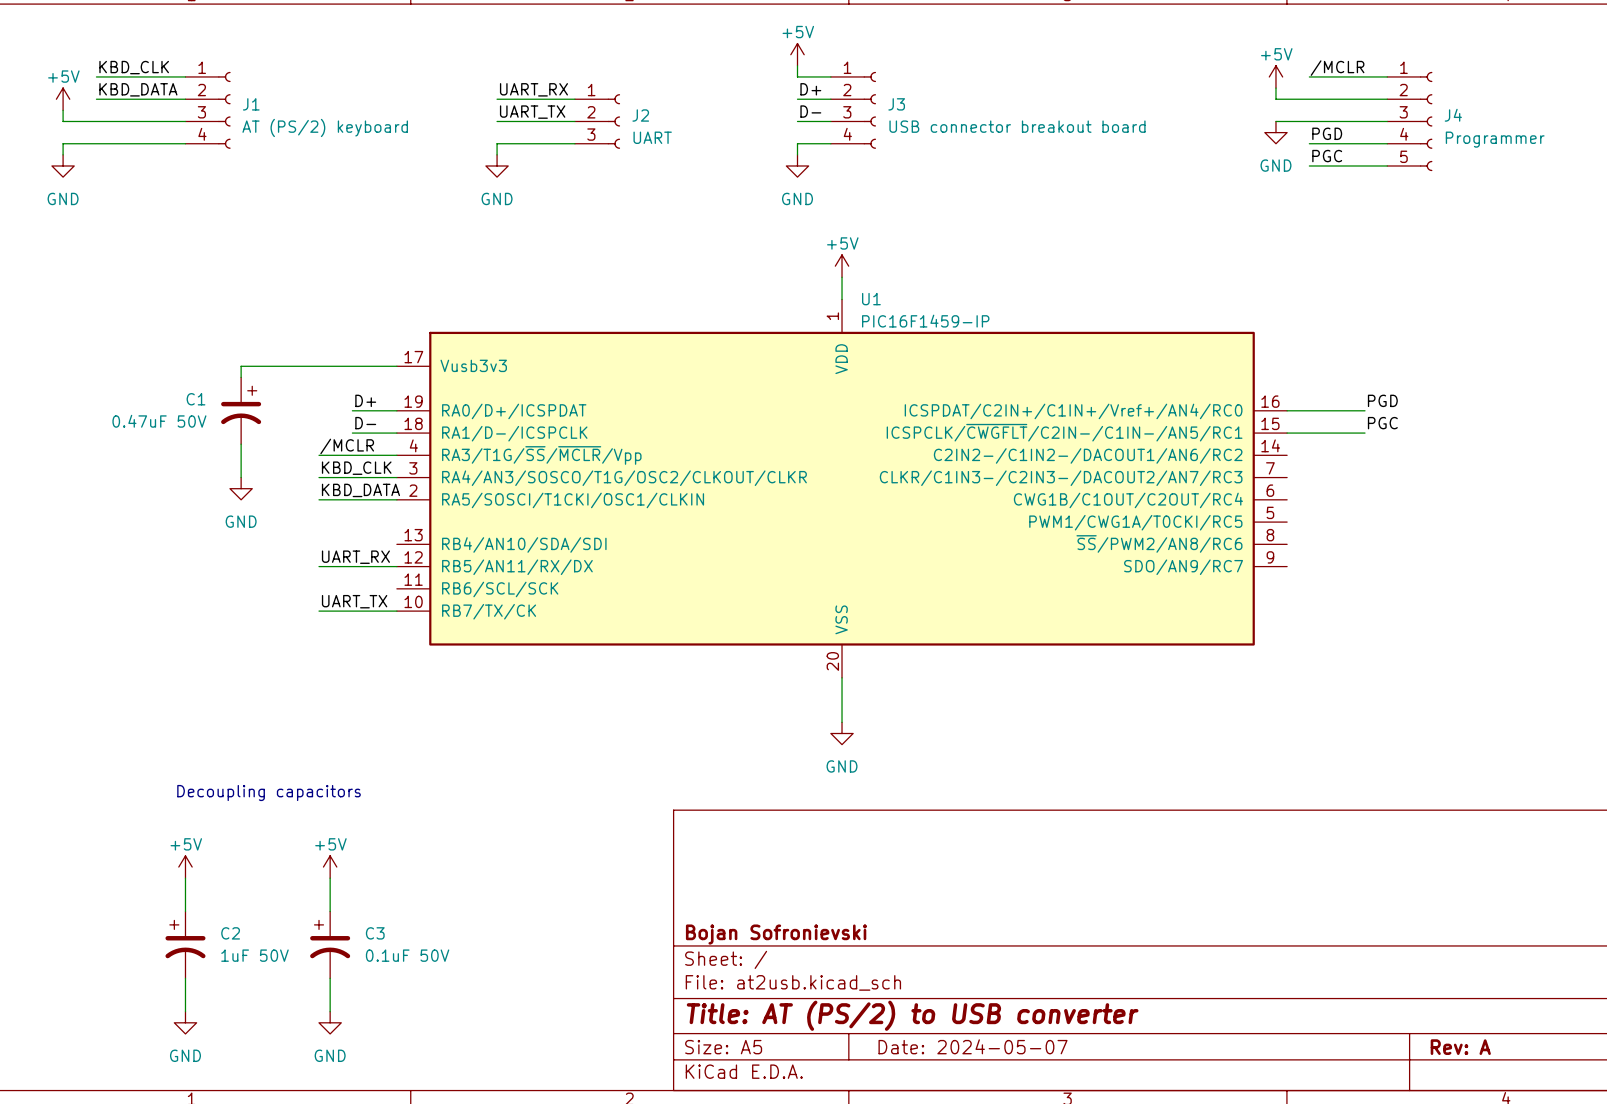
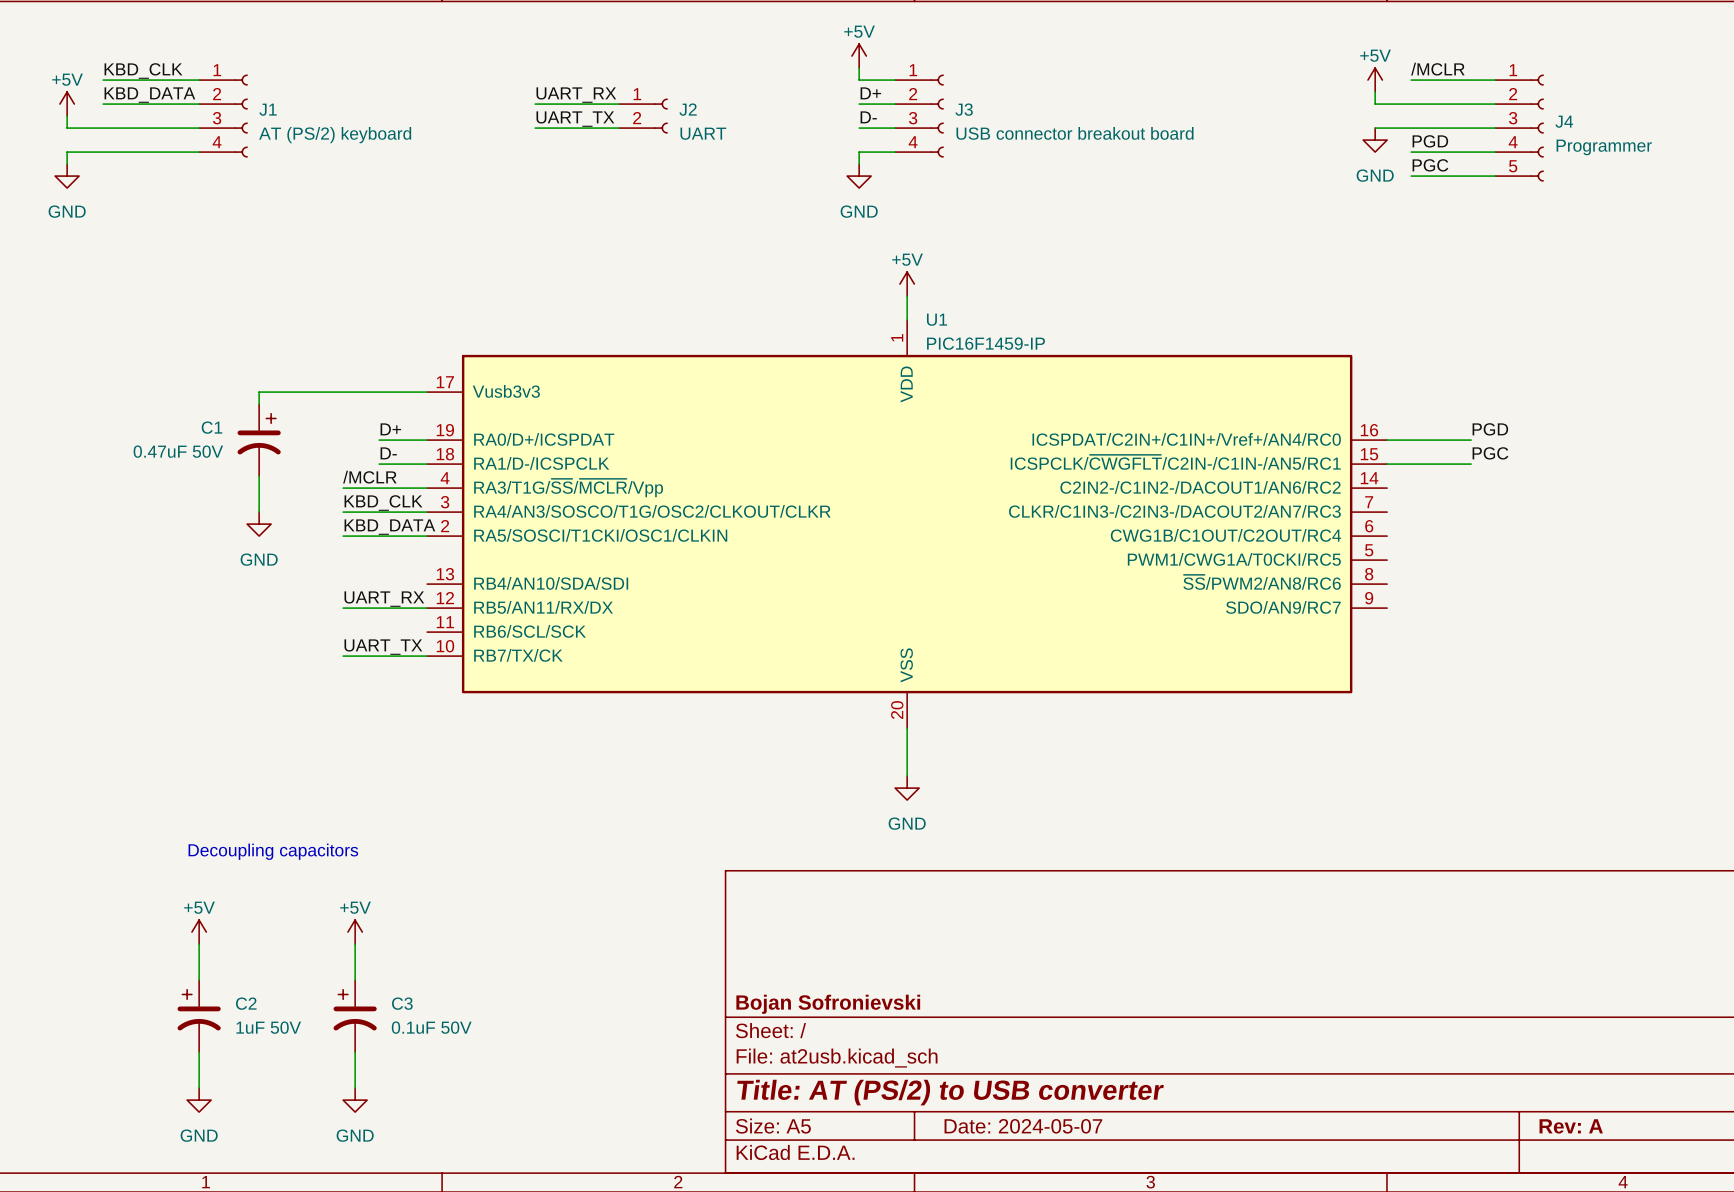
J2 symbol: [574, 94, 621, 149] -> [619, 98, 668, 134]
wire: (574, 143) (497, 143) (497, 154) -> none
power symbol: GND (497, 165) -> none

